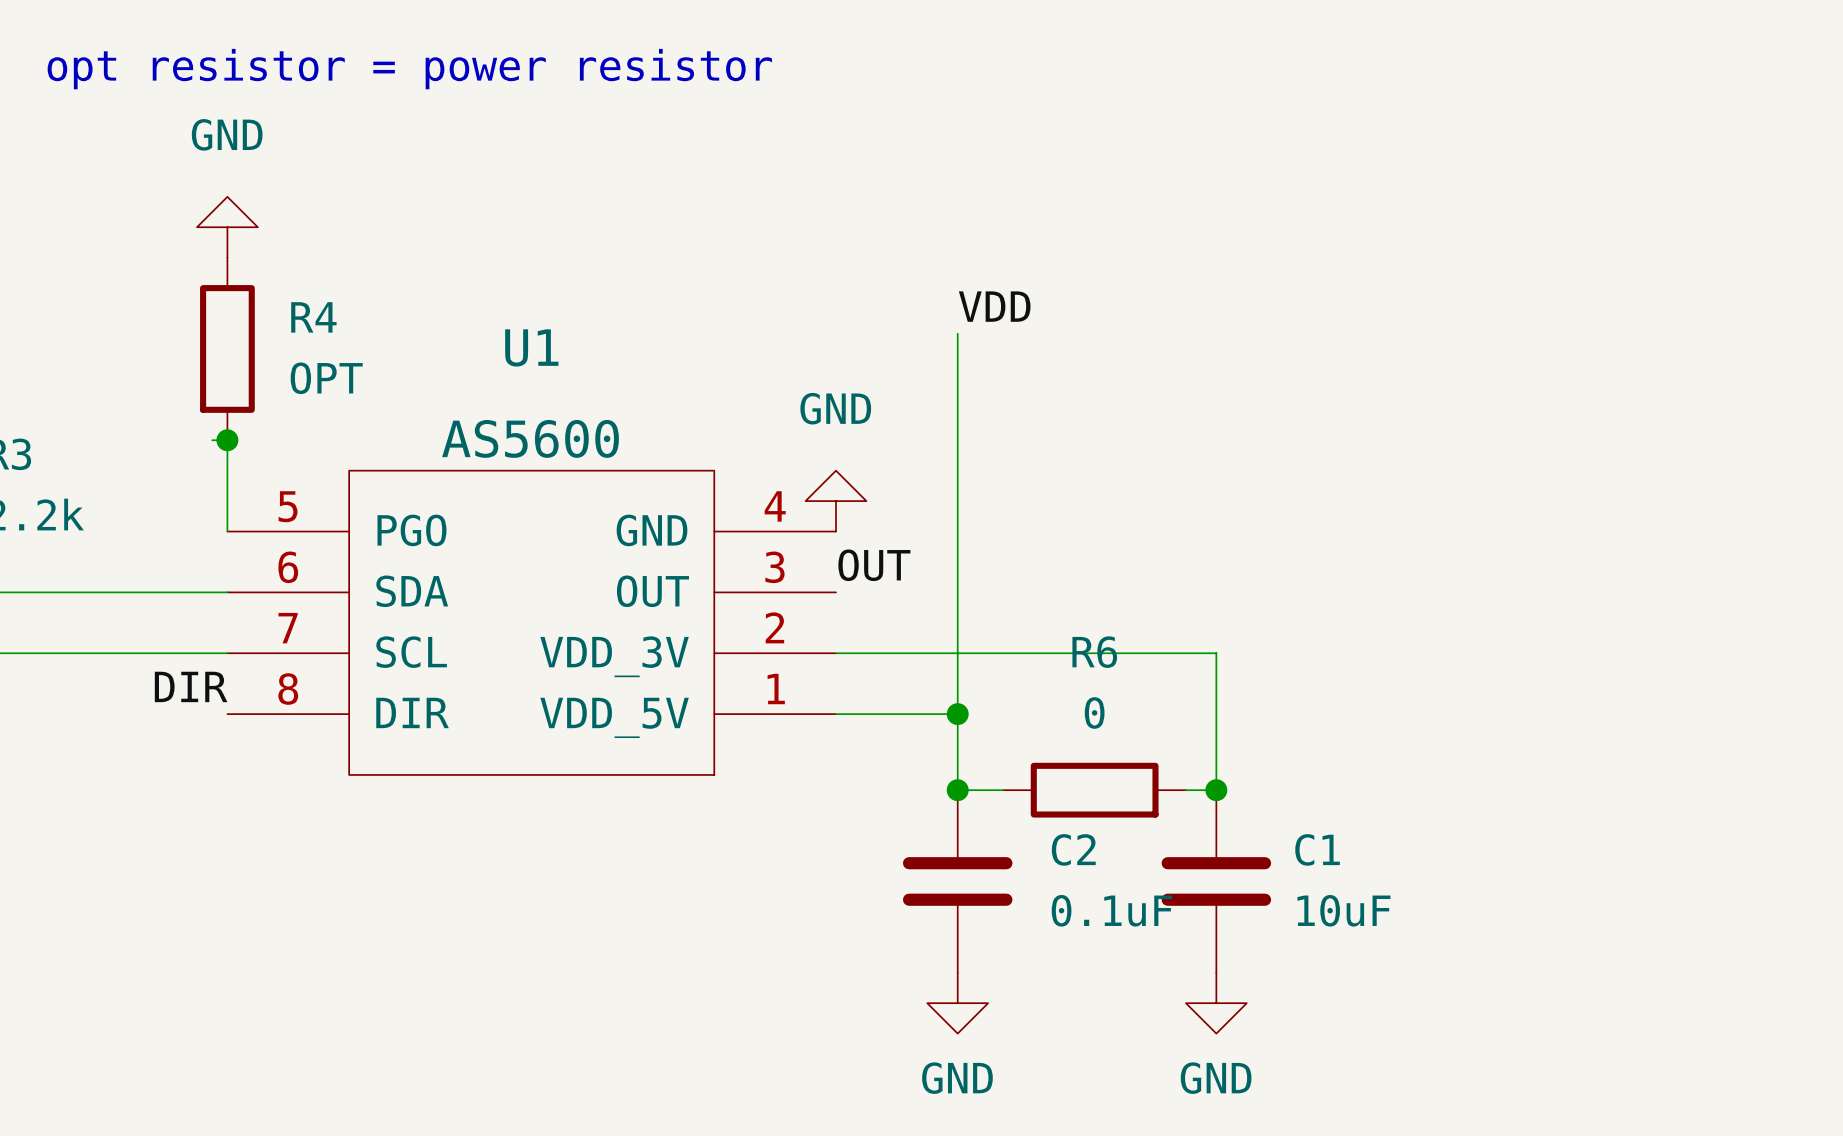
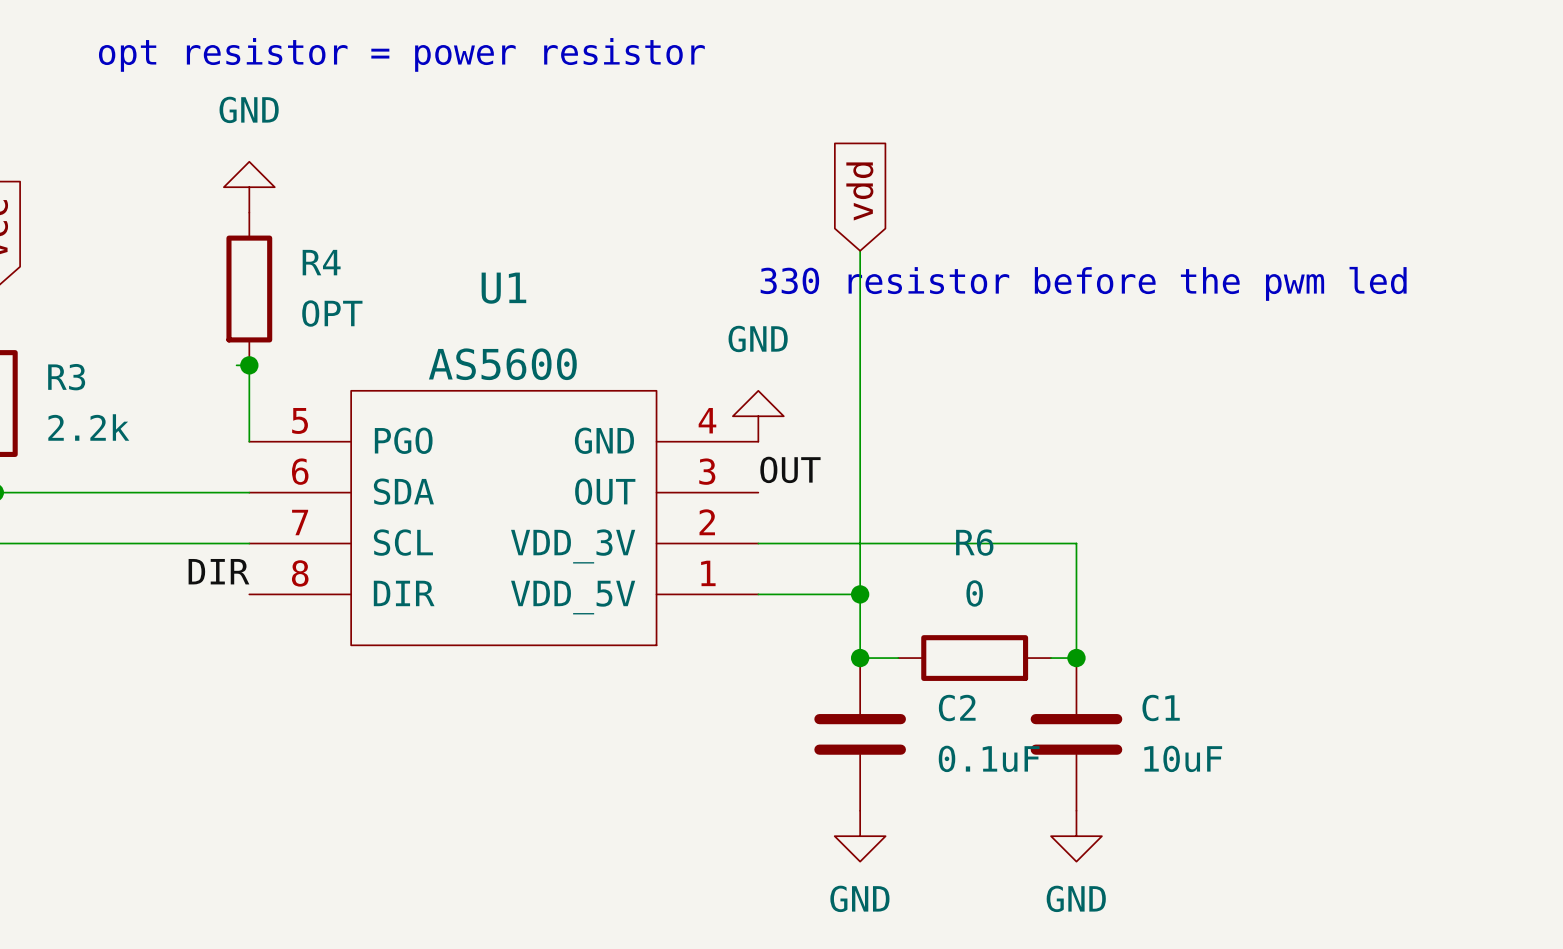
global label: none -> vdd (859, 191)
wire: none -> (860, 250) (860, 276)
label: VDD (994, 306) -> none
text: none -> 330 resistor before the pwm led (1083, 283)

